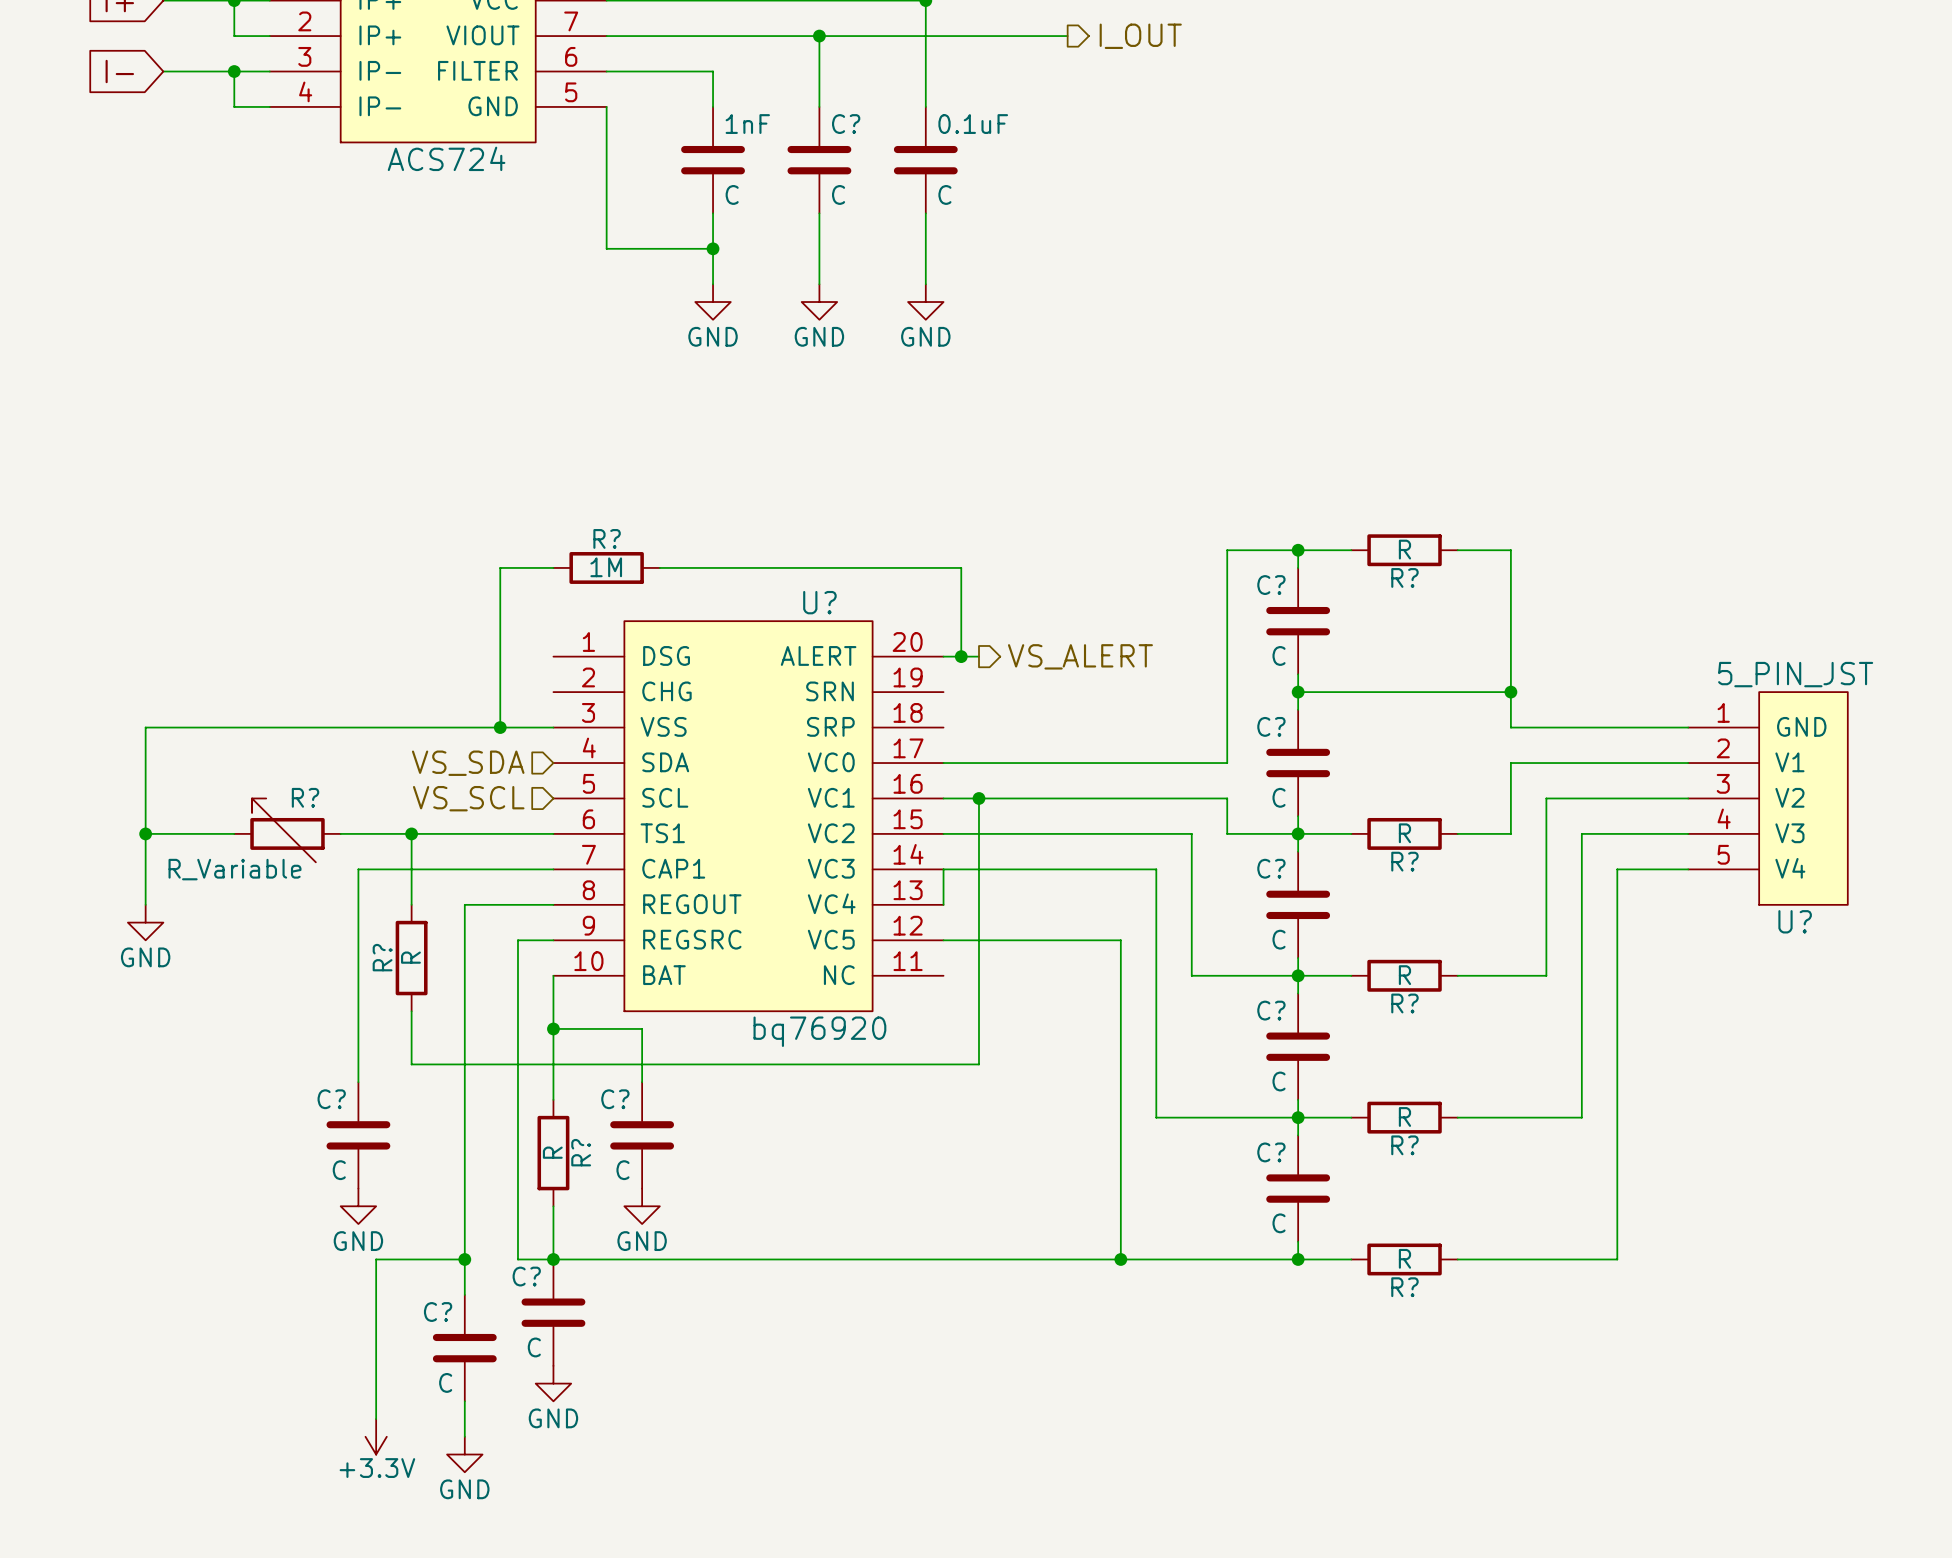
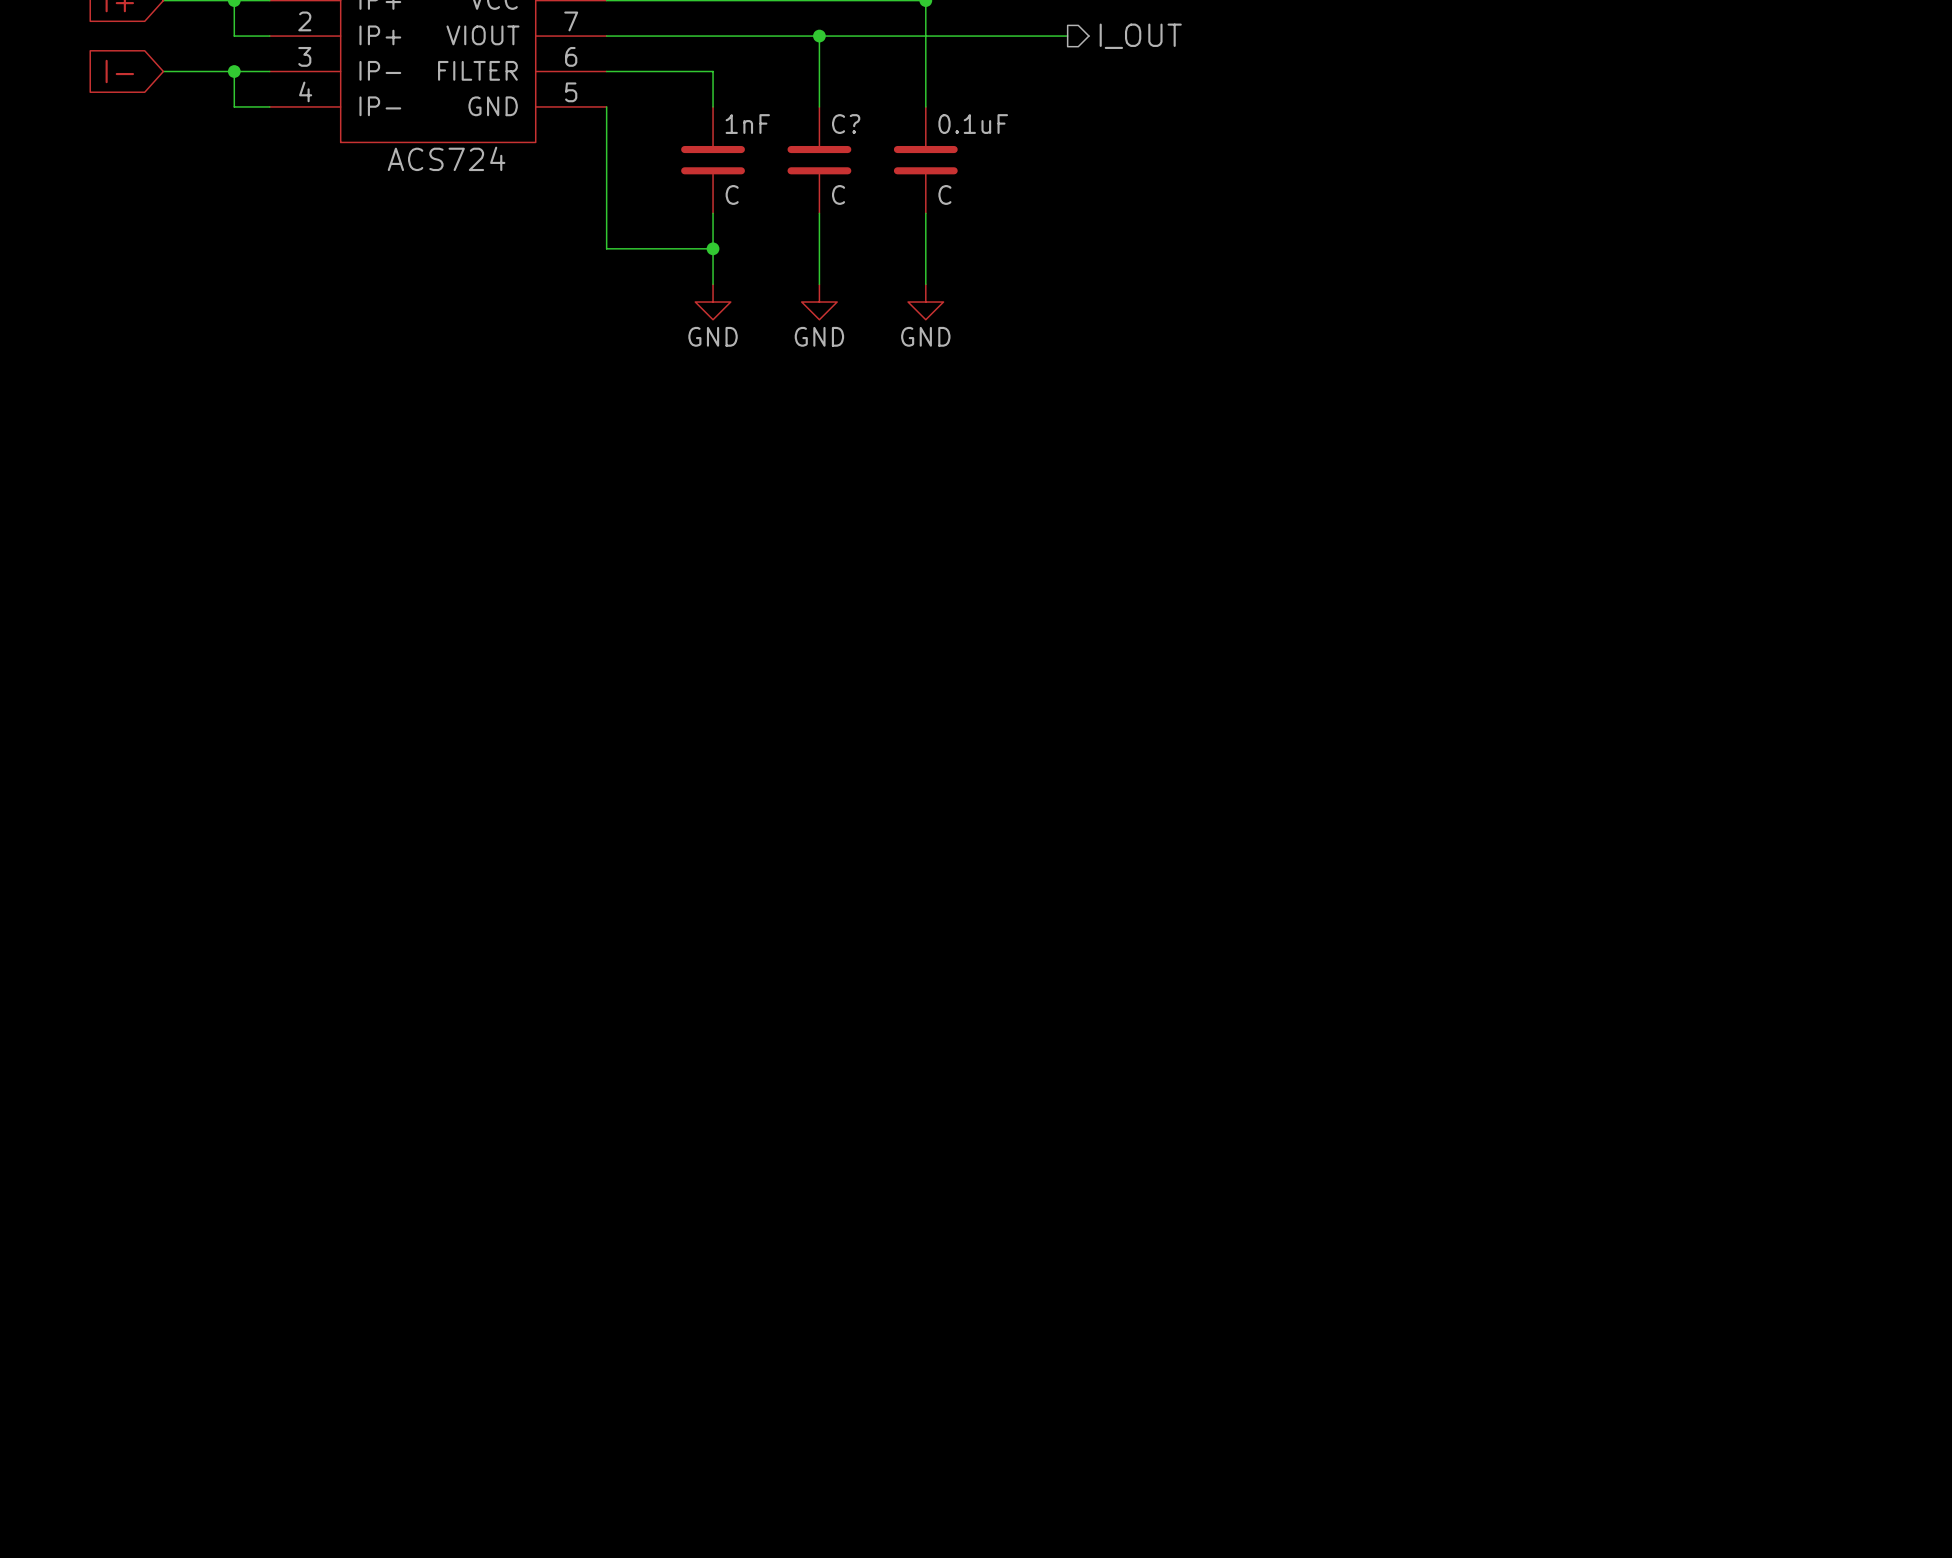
wire: (1298, 550) (1298, 567) -> none
junction: (1298, 550) -> none
wire: (1351, 550) (1227, 550) (1227, 763) (943, 763) -> none
R?: R (1404, 550) -> none
wire: (1457, 550) (1510, 550) (1510, 727) (1688, 727) -> none
wire: (553, 567) (500, 567) (500, 727) -> none
R?: 1M (606, 567) -> none
wire: (659, 567) (961, 567) (961, 656) -> none
C?: C (1298, 621) -> none
wire: (943, 656) (978, 656) -> none
junction: (961, 656) -> none
hierarchical label: VS_ALERT (1080, 656) -> none
wire: (1298, 674) (1298, 709) -> none
wire: (1298, 692) (1510, 692) -> none
junction: (1298, 692) -> none
junction: (1510, 692) -> none
junction: (500, 727) -> none
wire: (553, 727) (145, 727) (145, 904) -> none
hierarchical label: VS_SDA (468, 763) -> none
C?: C (1298, 763) -> none
wire: (1688, 763) (1510, 763) (1510, 833) (1457, 833) -> none
hierarchical label: VS_SCL (468, 798) -> none
wire: (943, 798) (1227, 798) (1227, 833) (1351, 833) -> none
wire: (978, 798) (978, 1064) (411, 1064) (411, 1011) -> none
junction: (978, 798) -> none
wire: (1688, 798) (1546, 798) (1546, 975) (1457, 975) -> none
U?: 5_PIN_JST (1768, 798) -> none
U?: bq76920 (748, 816) -> none
wire: (1298, 816) (1298, 851) -> none
R?: R_Variable (287, 830) -> none
wire: (145, 833) (234, 833) -> none
junction: (145, 833) -> none
wire: (340, 833) (553, 833) -> none
wire: (411, 833) (411, 904) -> none
junction: (411, 833) -> none
wire: (943, 833) (1191, 833) (1191, 975) (1351, 975) -> none
junction: (1298, 833) -> none
R?: R (1404, 833) -> none
wire: (1688, 833) (1581, 833) (1581, 1117) (1457, 1117) -> none
wire: (553, 869) (358, 869) (358, 1082) -> none
wire: (1688, 869) (1617, 869) (1617, 1259) (1457, 1259) -> none
wire: (553, 904) (464, 904) (464, 1294) -> none
wire: (943, 904) (943, 869) (1156, 869) (1156, 1117) (1351, 1117) -> none
C?: C (1298, 904) -> none
power symbol: GND (145, 922) -> none
wire: (553, 940) (517, 940) (517, 1259) (1351, 1259) -> none
wire: (943, 940) (1120, 940) (1120, 1259) -> none
R?: R (411, 958) -> none
wire: (1298, 958) (1298, 993) -> none
wire: (553, 975) (553, 1099) -> none
junction: (1298, 975) -> none
R?: R (1404, 975) -> none
wire: (553, 1028) (642, 1028) (642, 1082) -> none
junction: (553, 1028) -> none
C?: C (1298, 1046) -> none
wire: (1298, 1099) (1298, 1135) -> none
junction: (1298, 1117) -> none
R?: R (1404, 1117) -> none
C?: C (358, 1135) -> none
C?: C (642, 1135) -> none
R?: R (553, 1153) -> none
C?: C (1298, 1188) -> none
power symbol: GND (358, 1206) -> none
wire: (553, 1206) (553, 1259) -> none
power symbol: GND (642, 1206) -> none
wire: (1298, 1241) (1298, 1259) -> none
wire: (464, 1259) (376, 1259) (376, 1419) -> none
junction: (464, 1259) -> none
junction: (553, 1259) -> none
junction: (1120, 1259) -> none
junction: (1298, 1259) -> none
R?: R (1404, 1259) -> none
C?: C (553, 1312) -> none
C?: C (464, 1348) -> none
power symbol: GND (553, 1383) -> none
wire: (464, 1401) (464, 1436) -> none
power symbol: +3.3V (376, 1436) -> none
power symbol: GND (464, 1454) -> none

